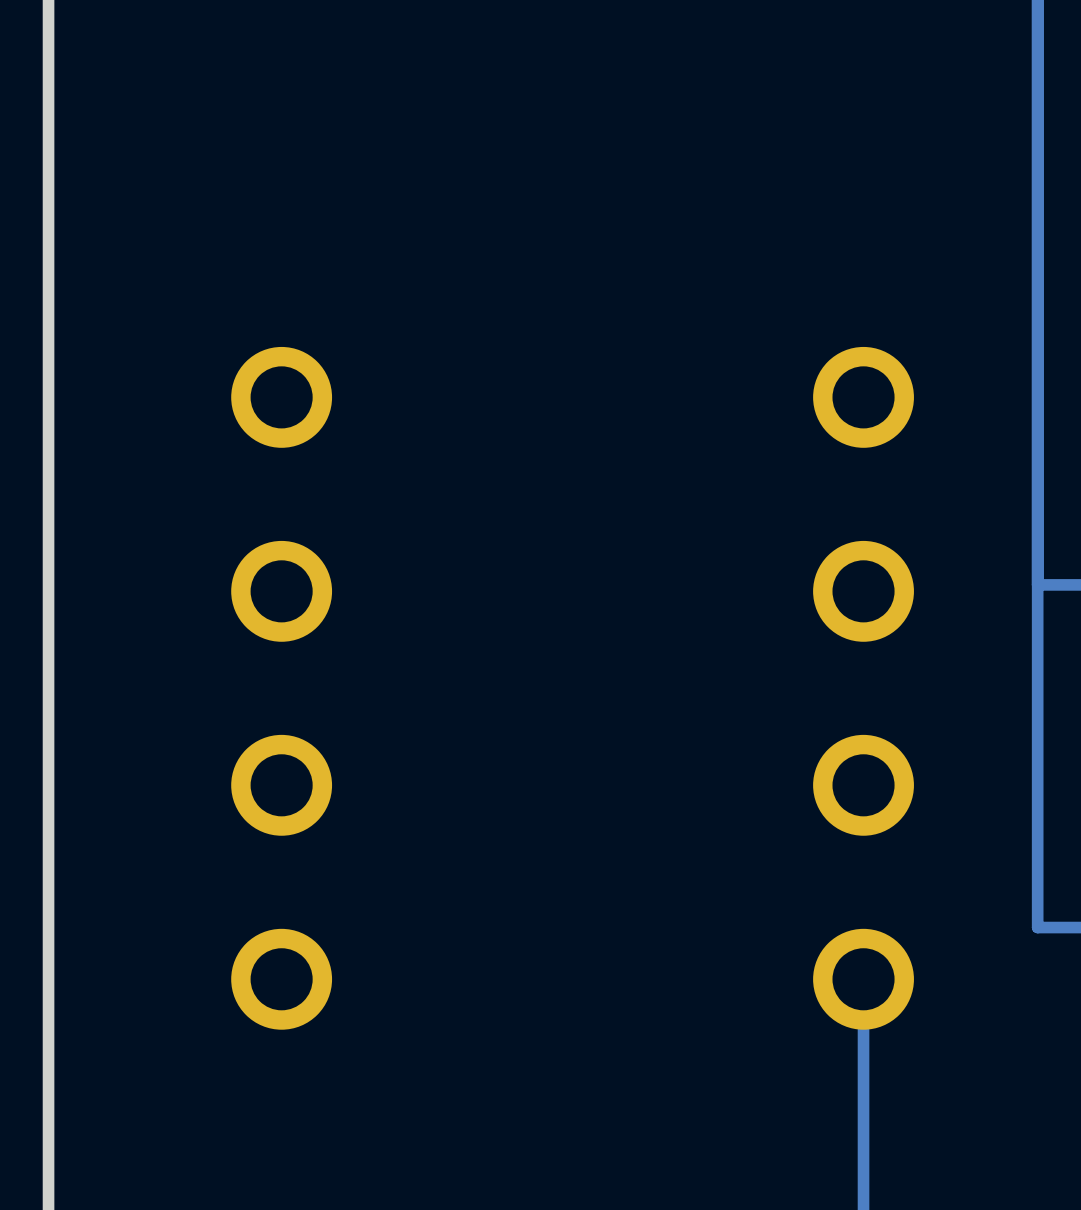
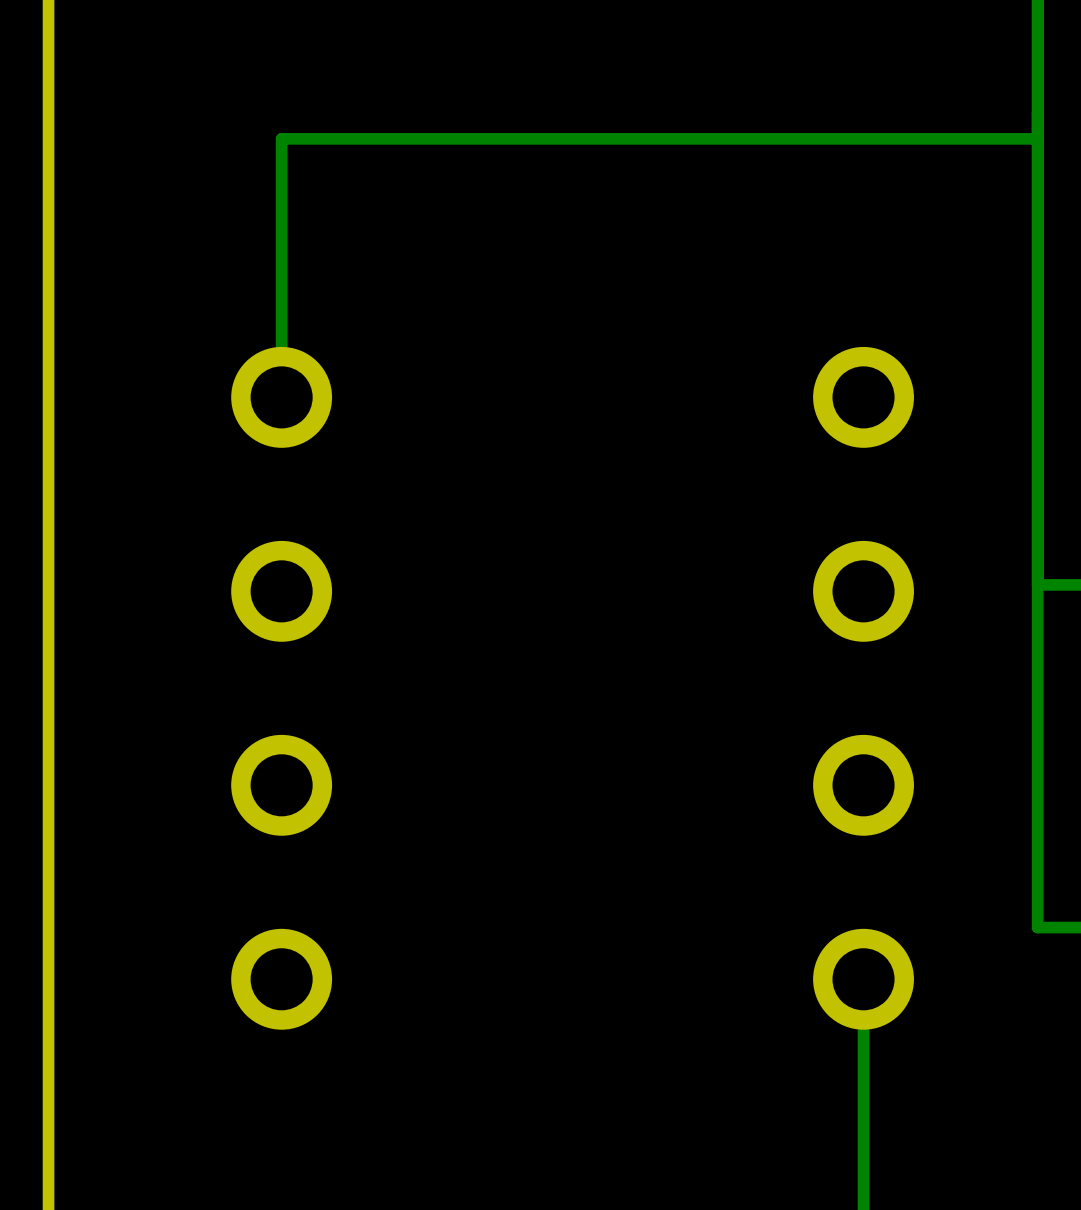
track: none -> (1037, 138) (281, 138) (281, 397)

